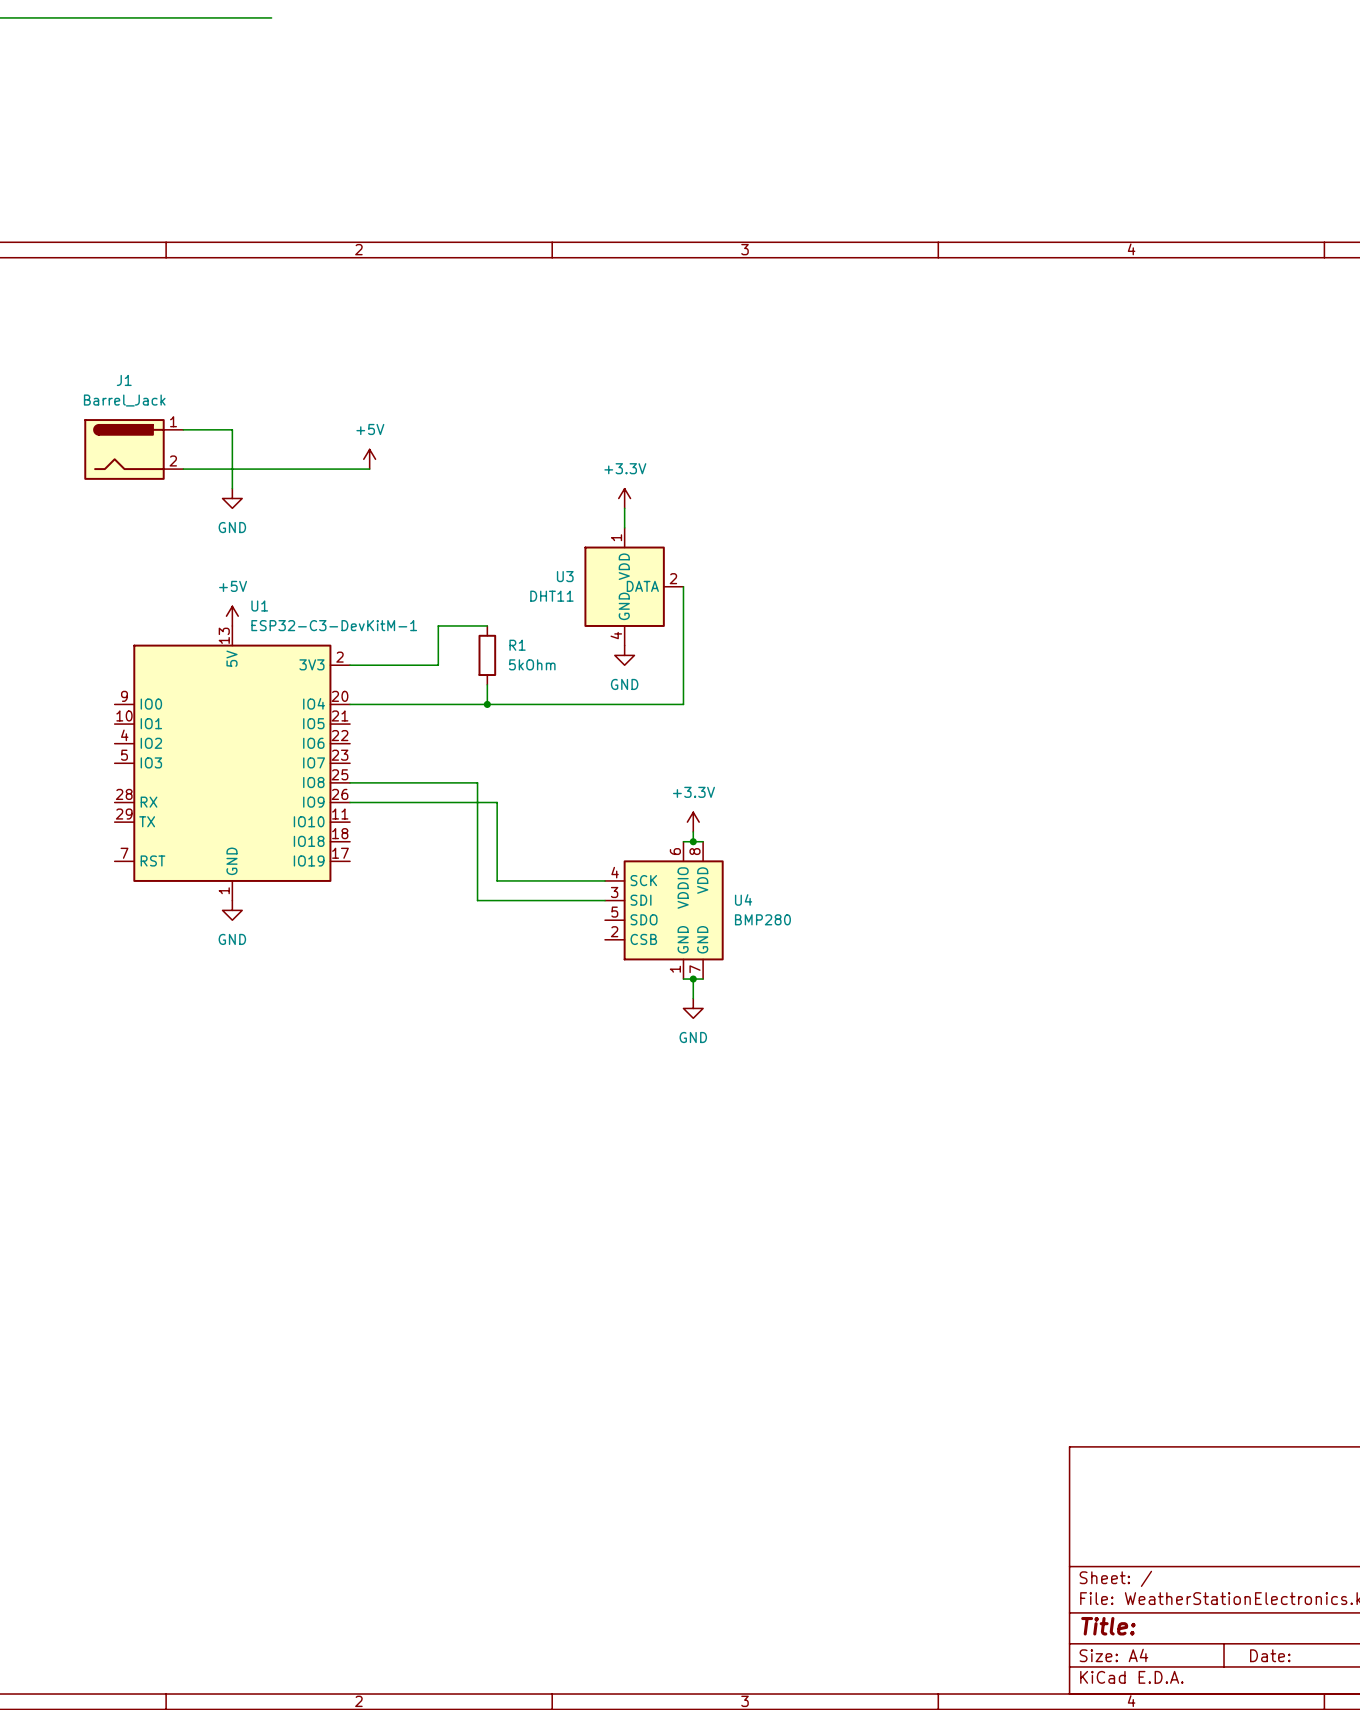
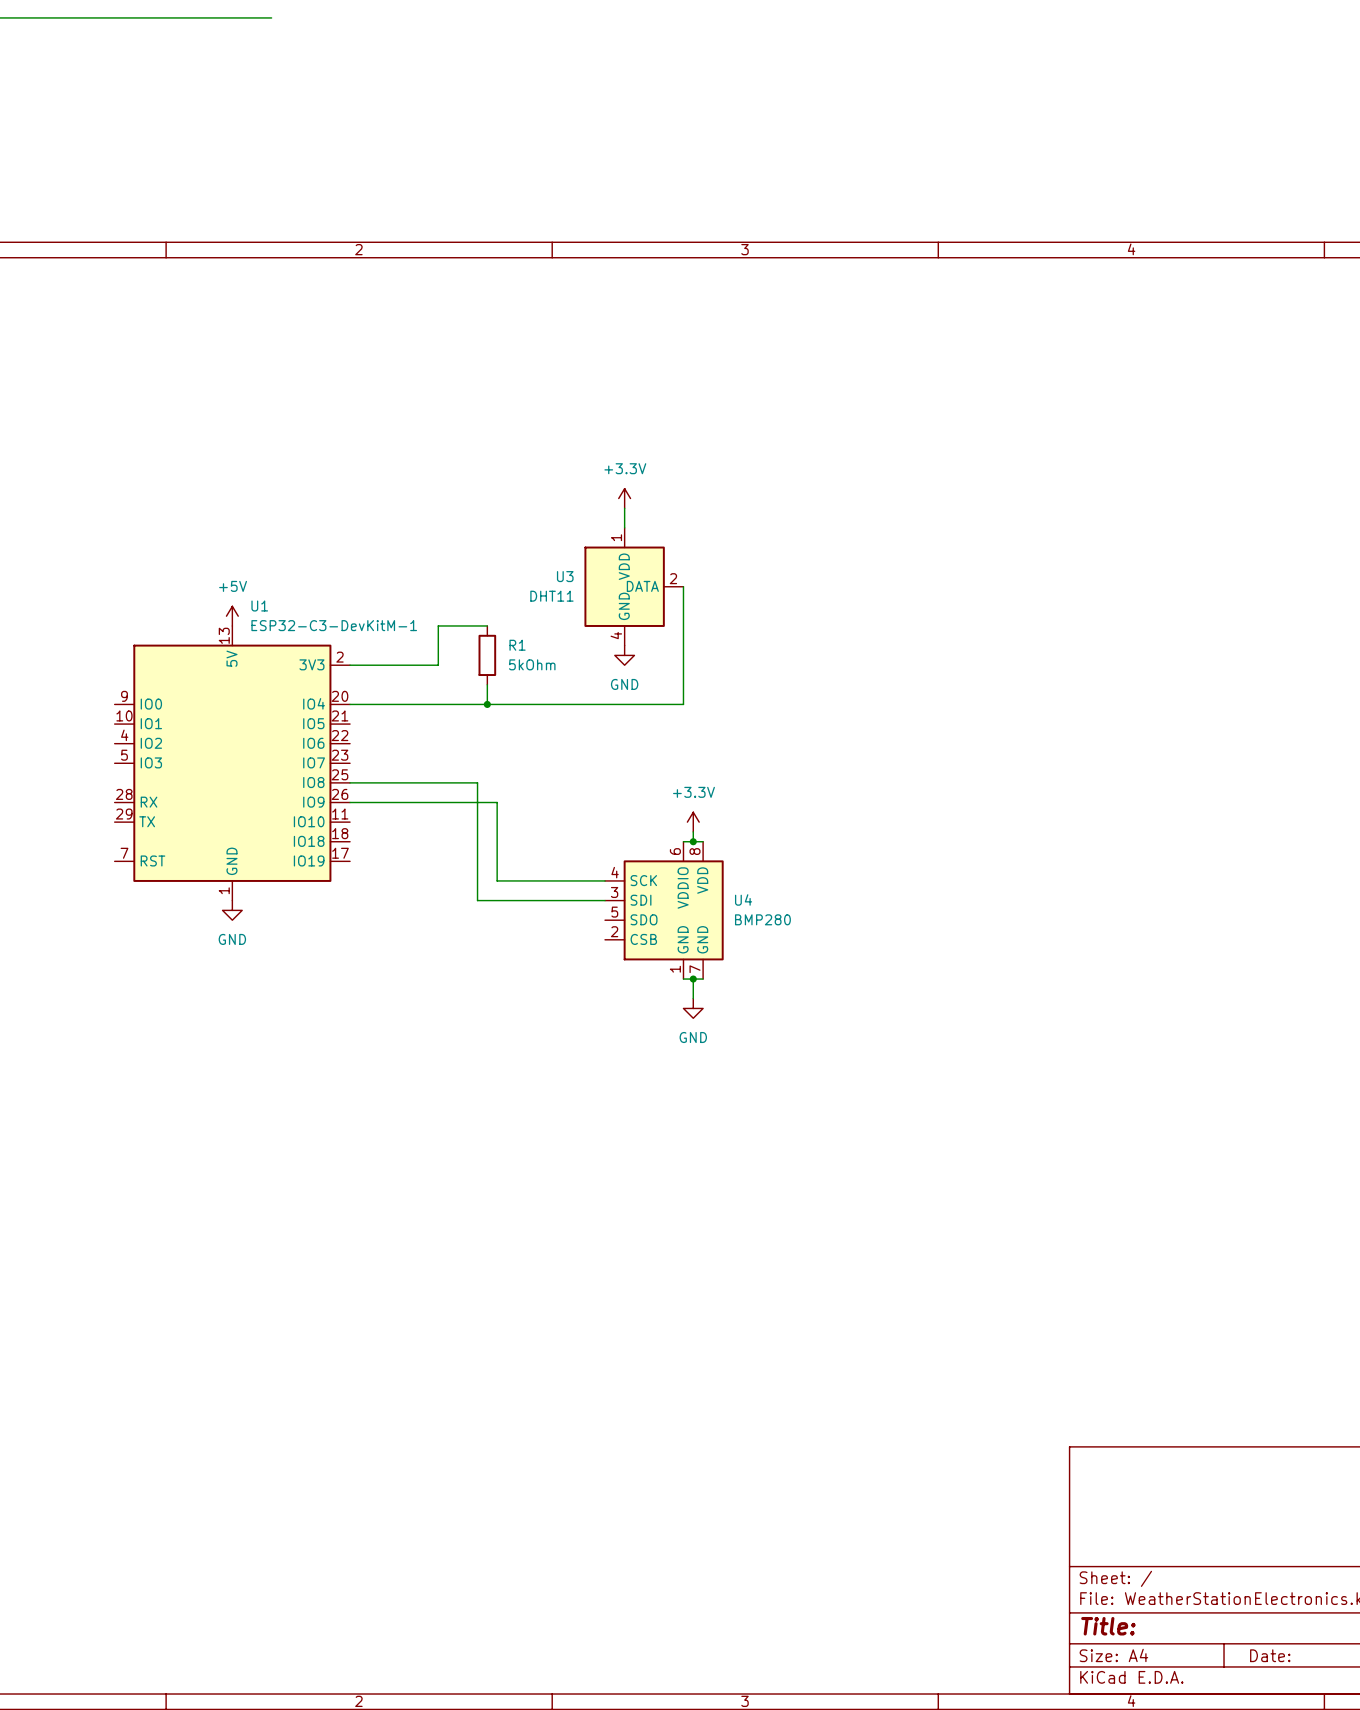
wire: (183, 429) (232, 429) (232, 488) -> none
J1: Barrel_Jack (133, 449) -> none
power symbol: +5V (369, 459) -> none
wire: (183, 469) (369, 469) -> none
power symbol: GND (232, 498) -> none

